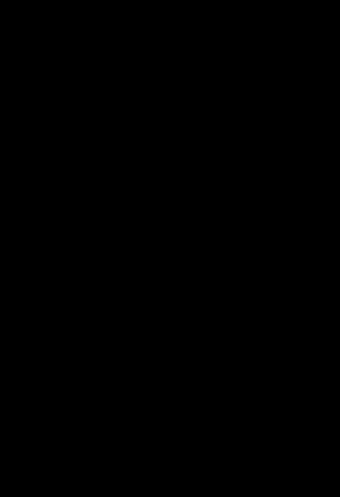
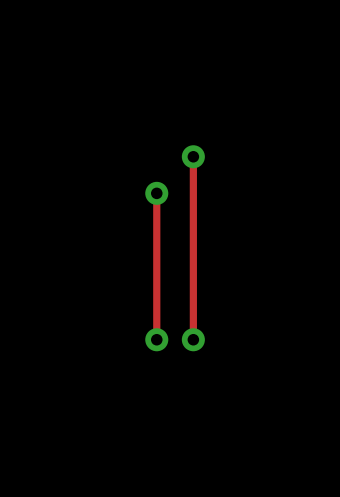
track: none -> (193, 156) (193, 339)
via: none -> (193, 156)
track: none -> (156, 193) (156, 339)
via: none -> (156, 193)
via: none -> (156, 339)
via: none -> (193, 339)

